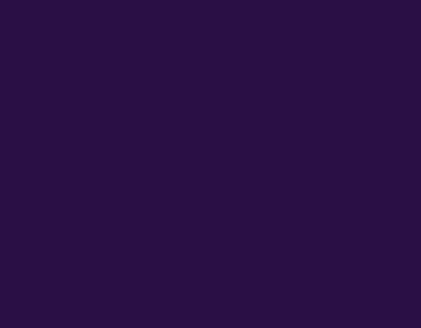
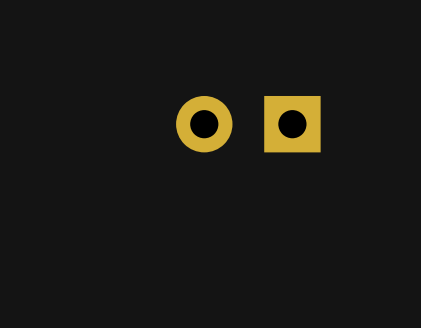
part: none -> (248, 124)

